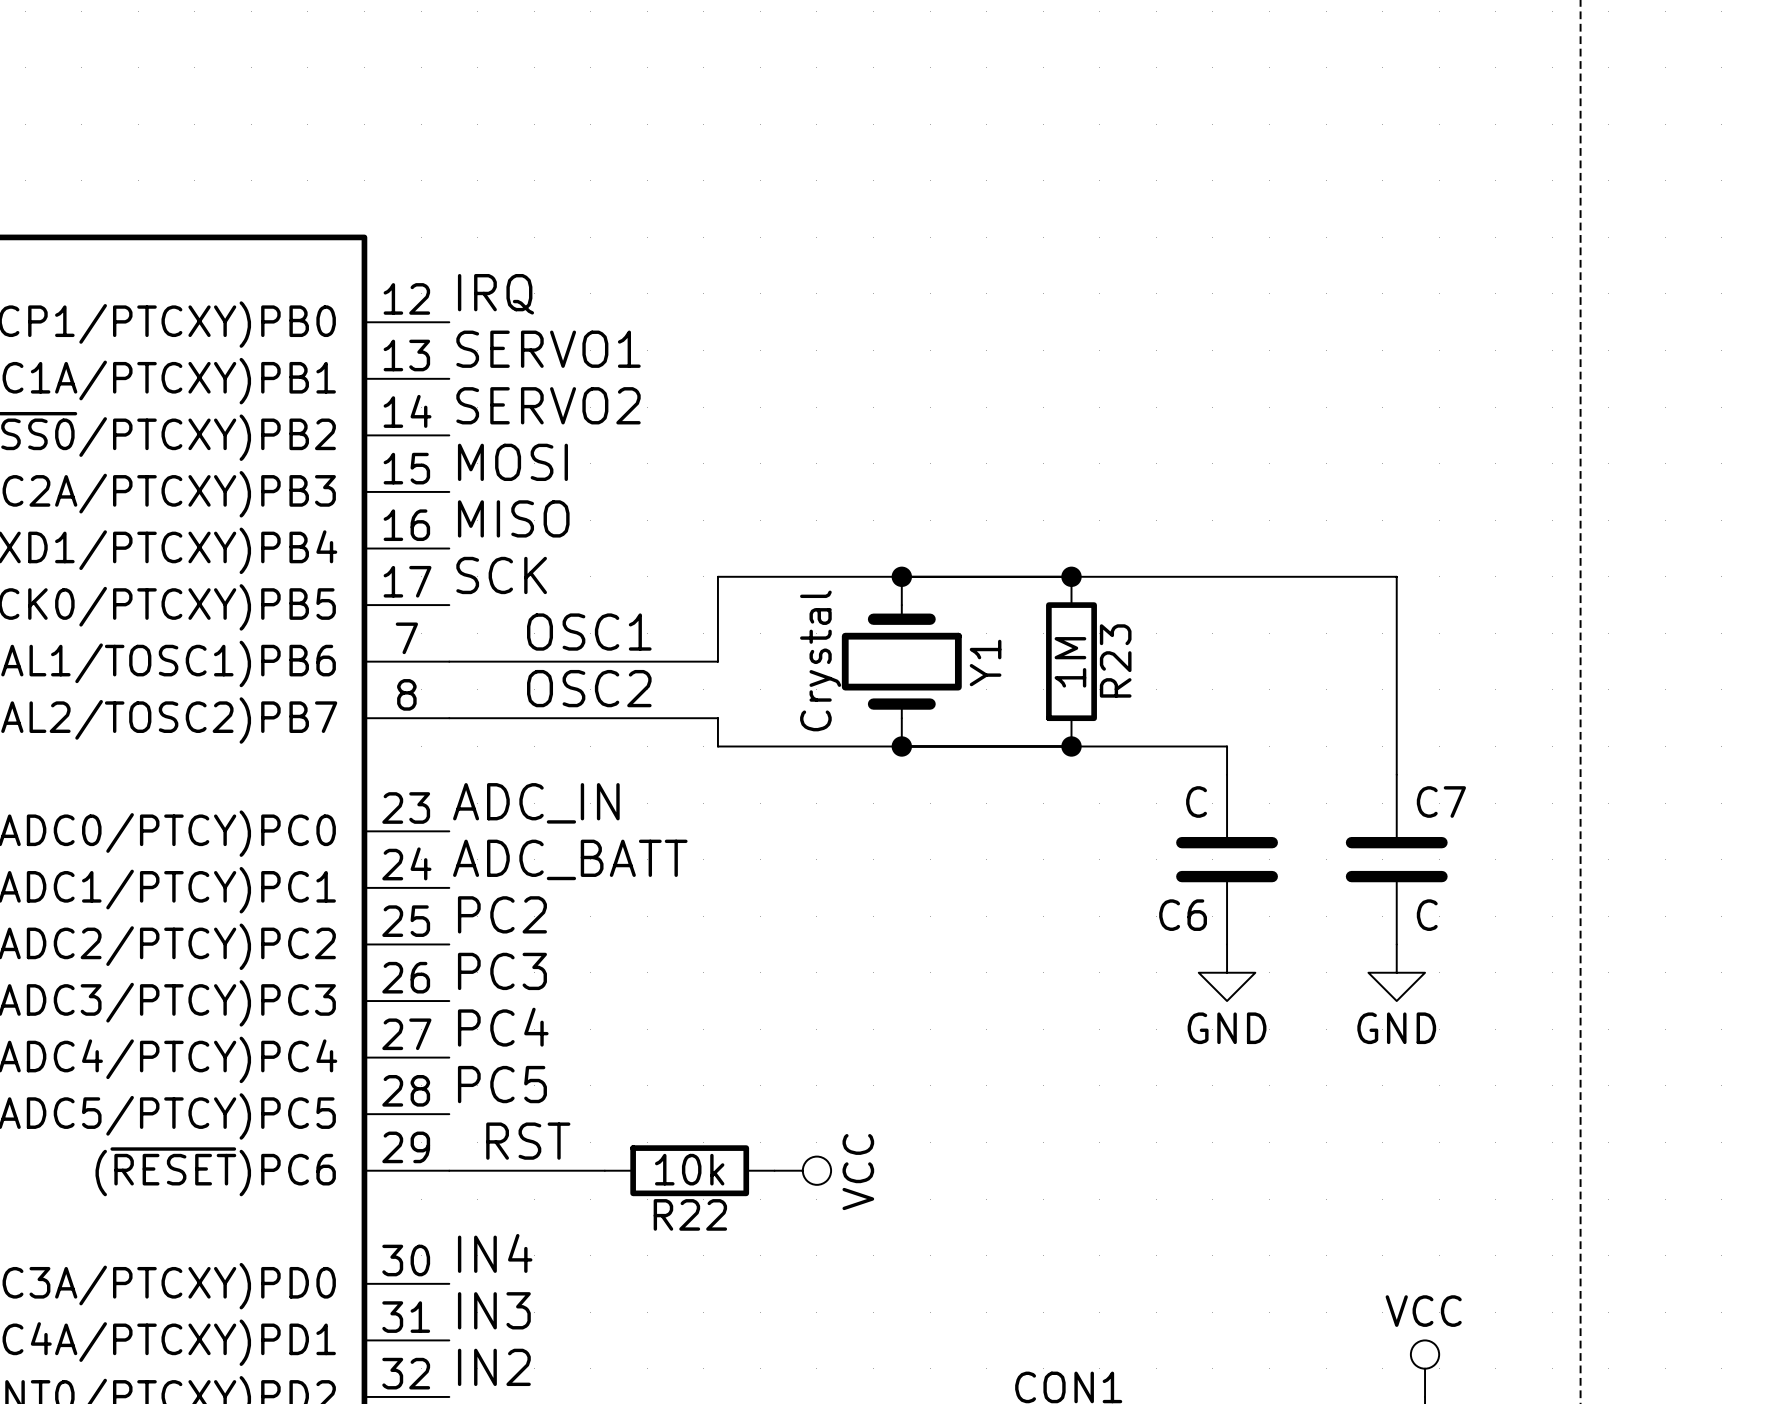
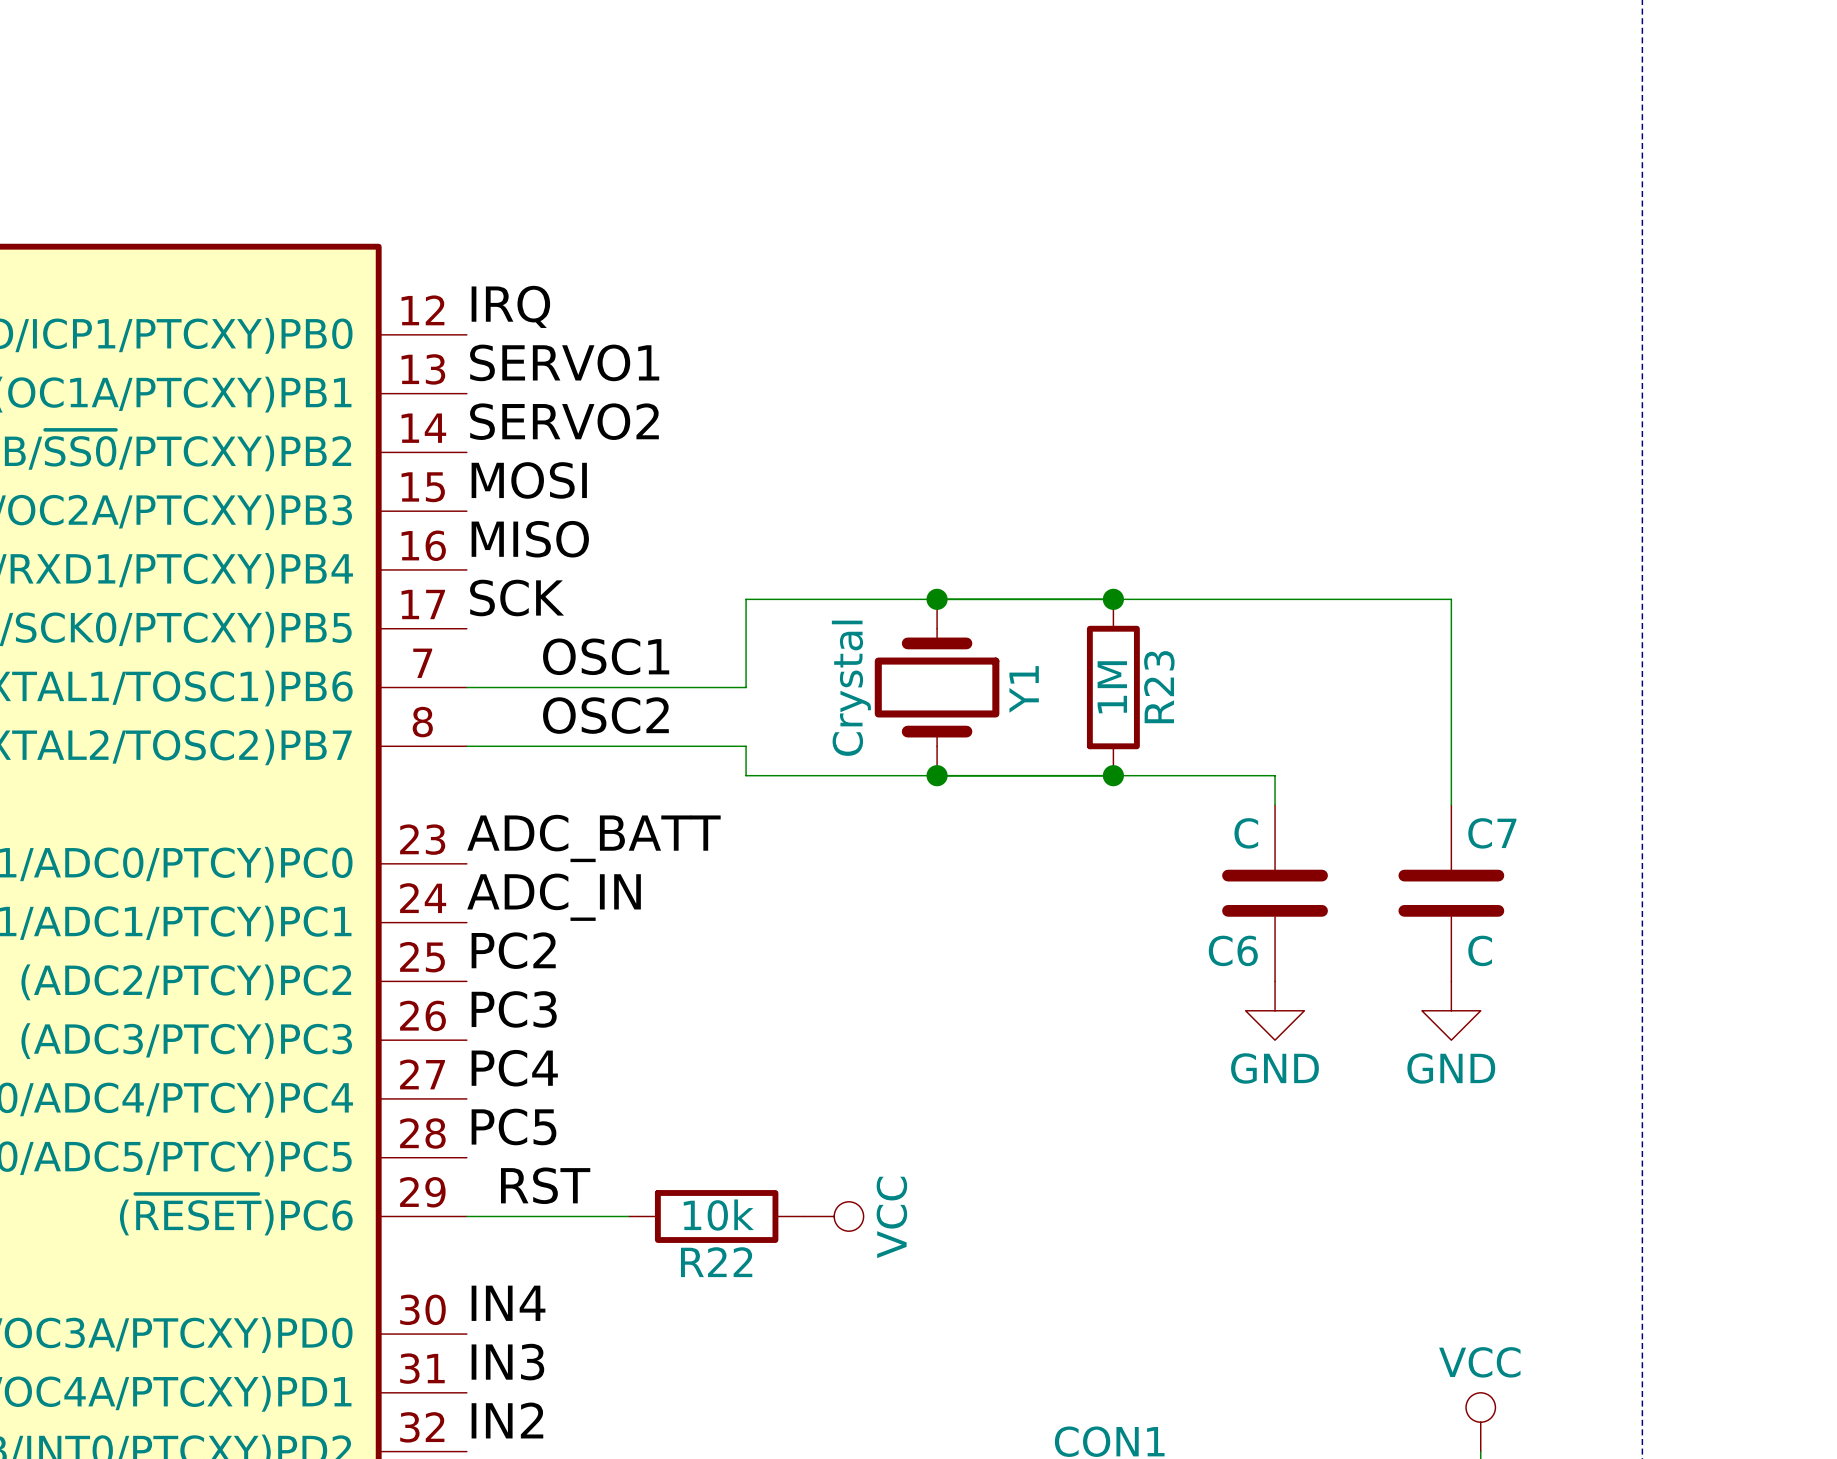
label: ADC_IN (536, 803) -> ADC_BATT (593, 838)
label: ADC_BATT (570, 859) -> ADC_IN (554, 897)

